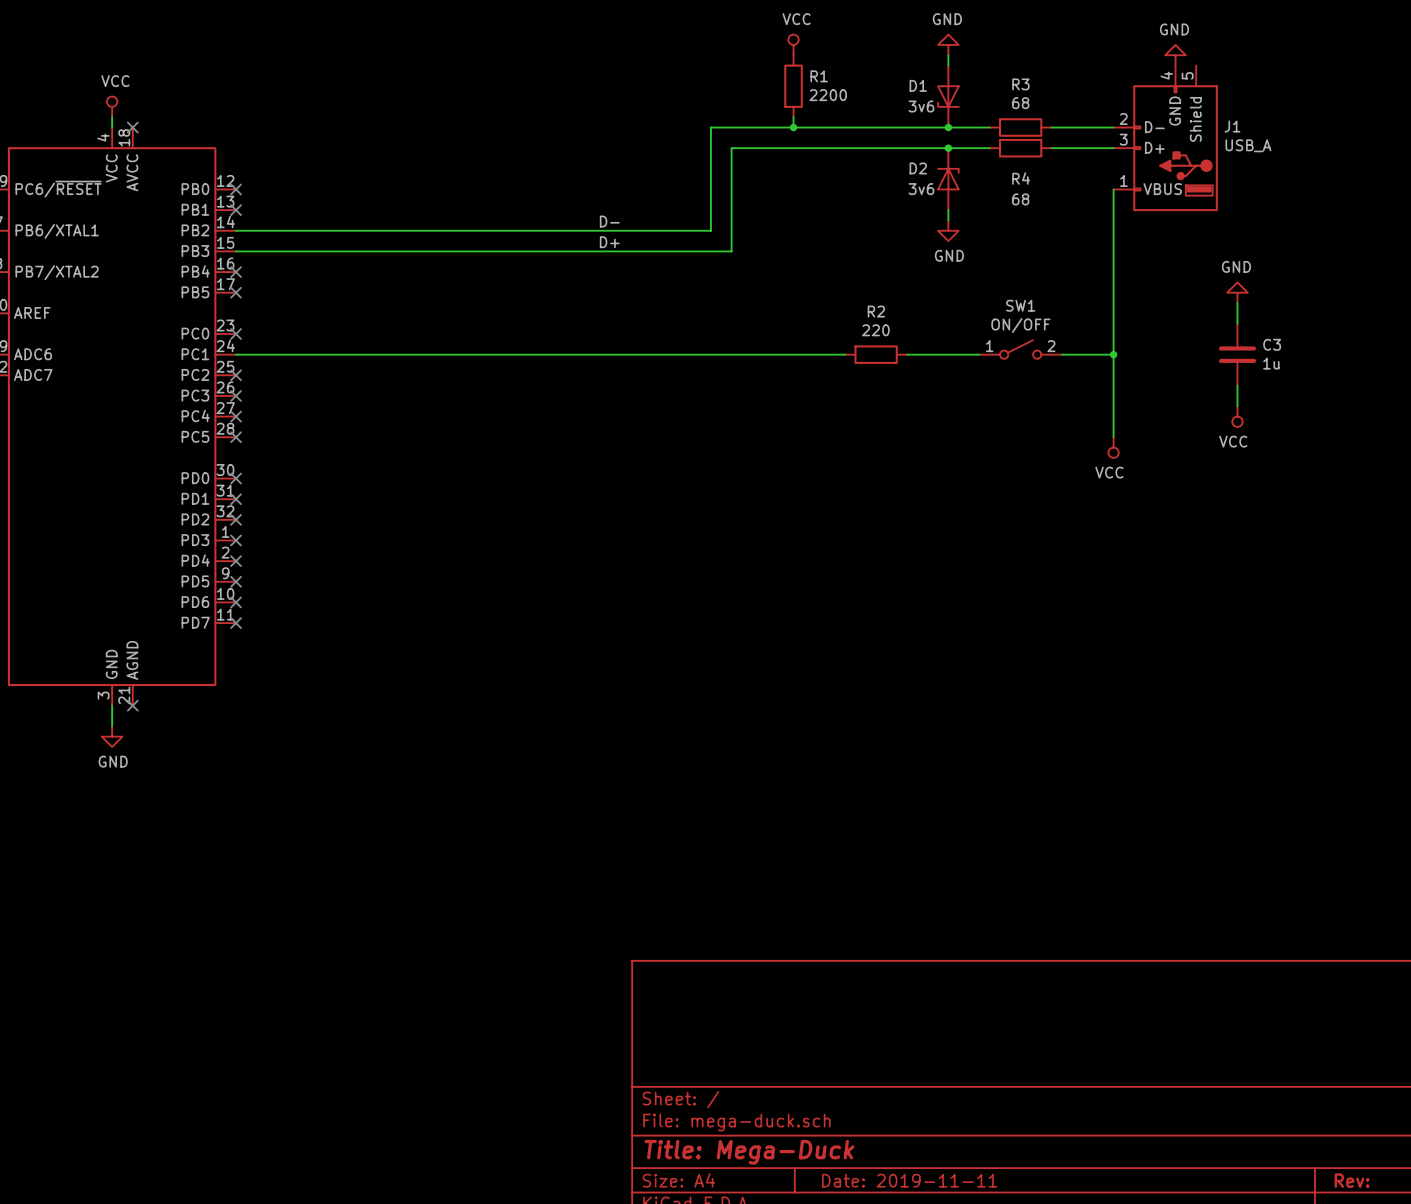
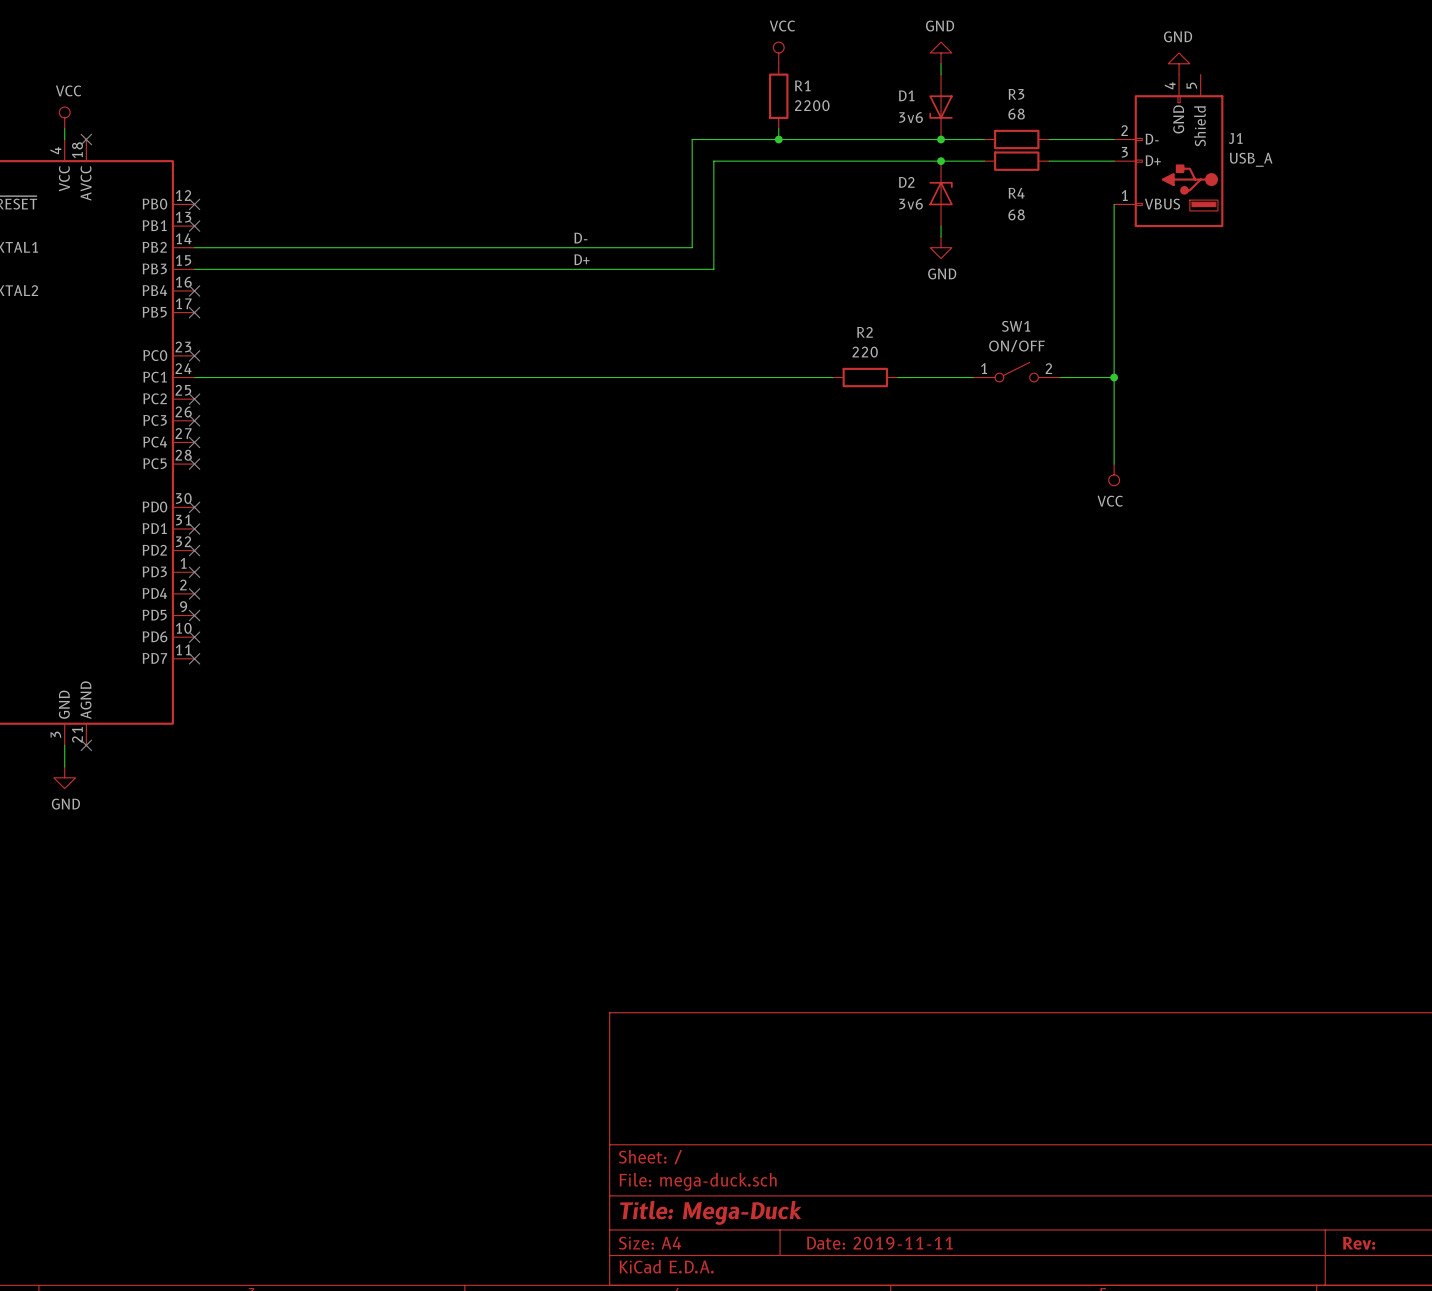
power symbol: GND (1237, 292) -> none
wire: (1237, 303) (1237, 323) -> none
C3: 1u (1237, 354) -> none
wire: (1237, 385) (1237, 406) -> none
power symbol: VCC (1237, 416) -> none

